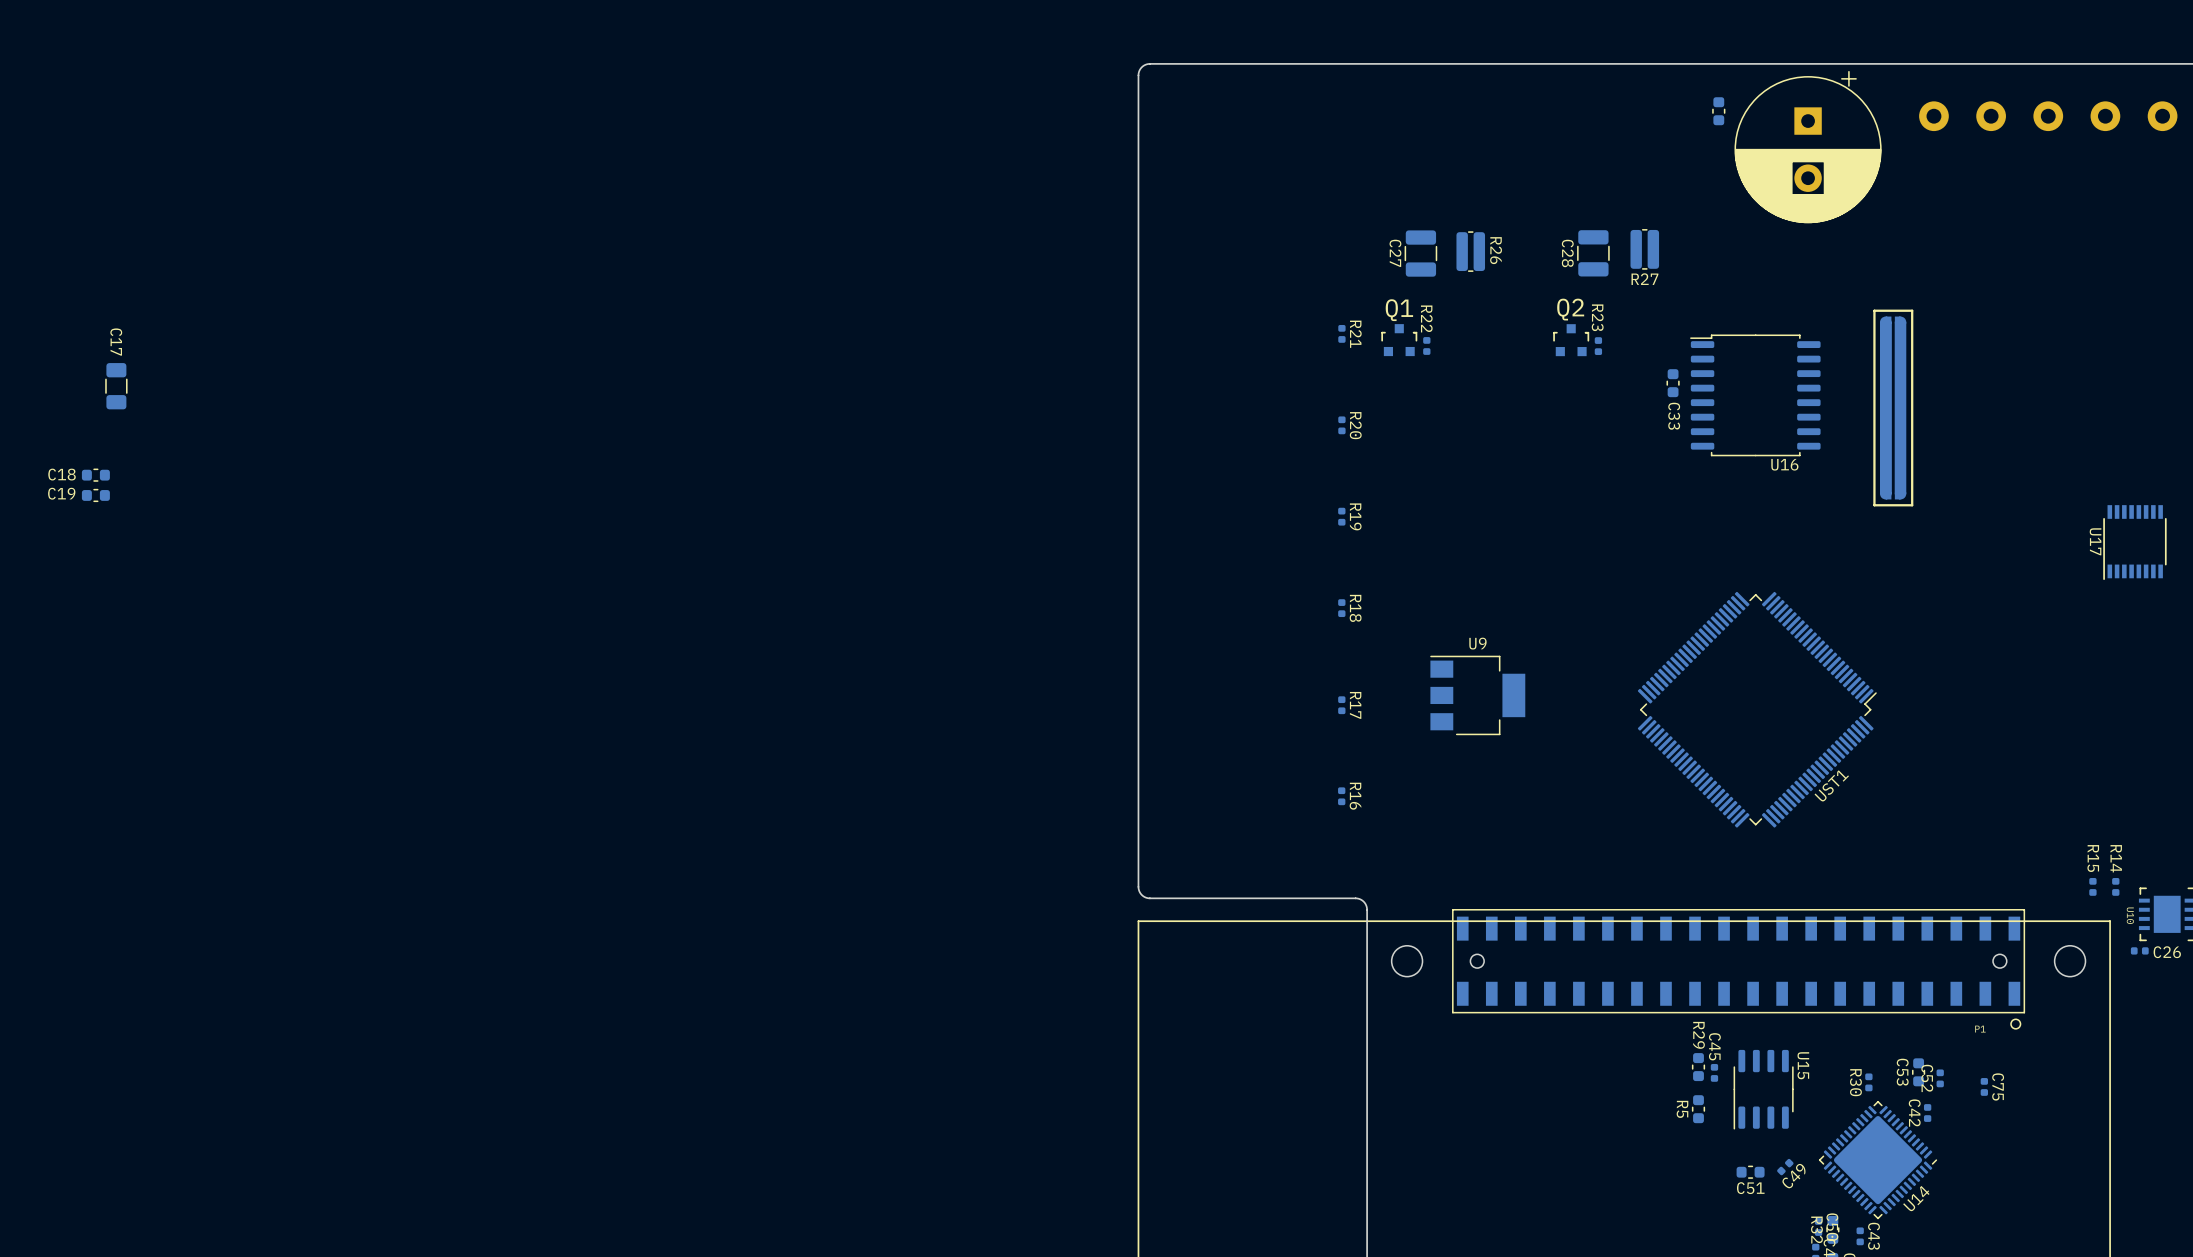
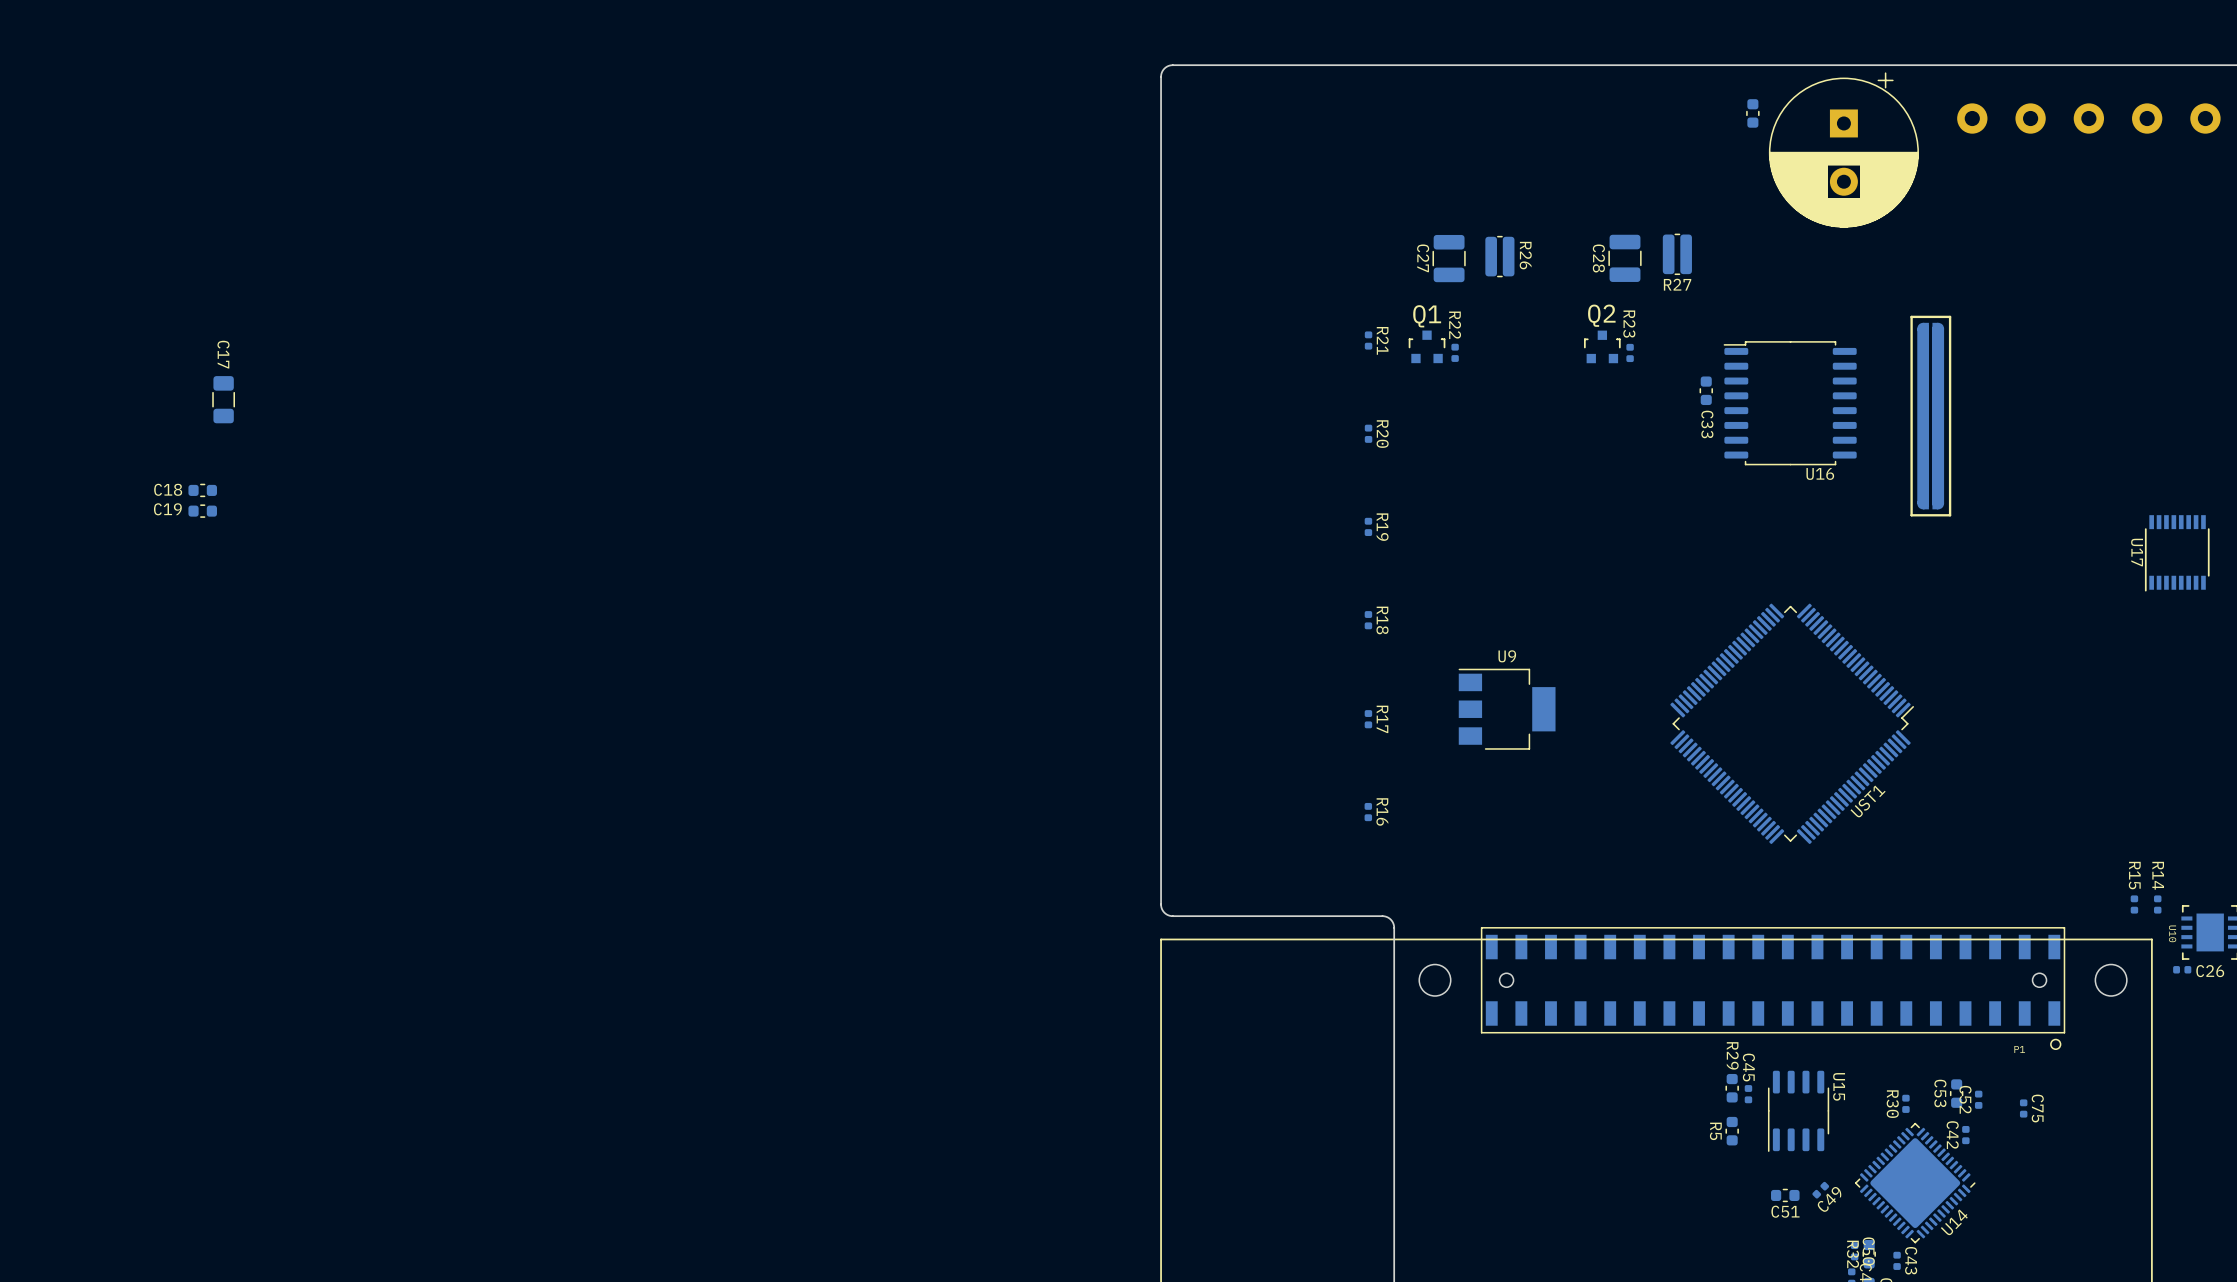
C17 position: (116, 386) -> (223, 399)
C18 position: (95, 475) -> (202, 490)
C19 position: (95, 495) -> (202, 511)

